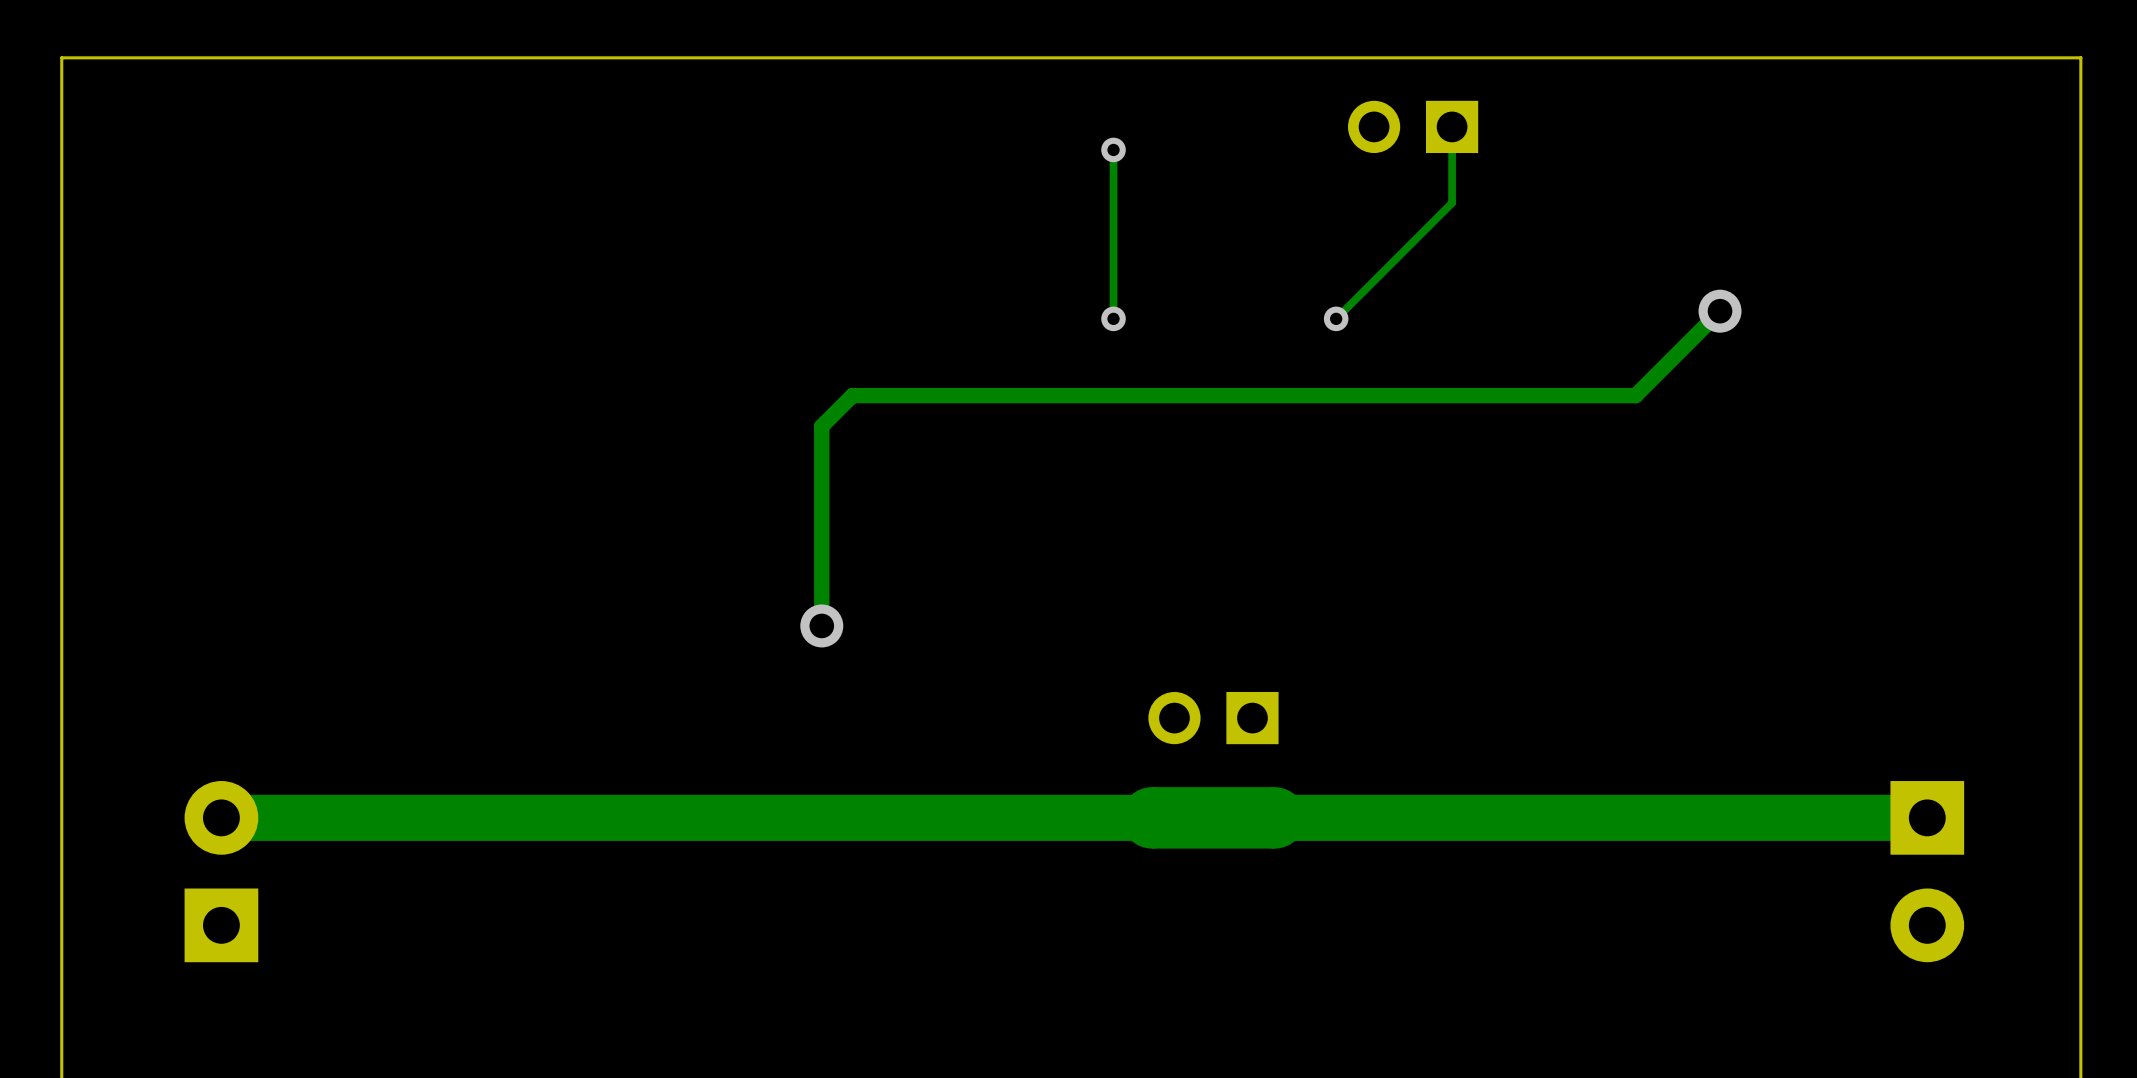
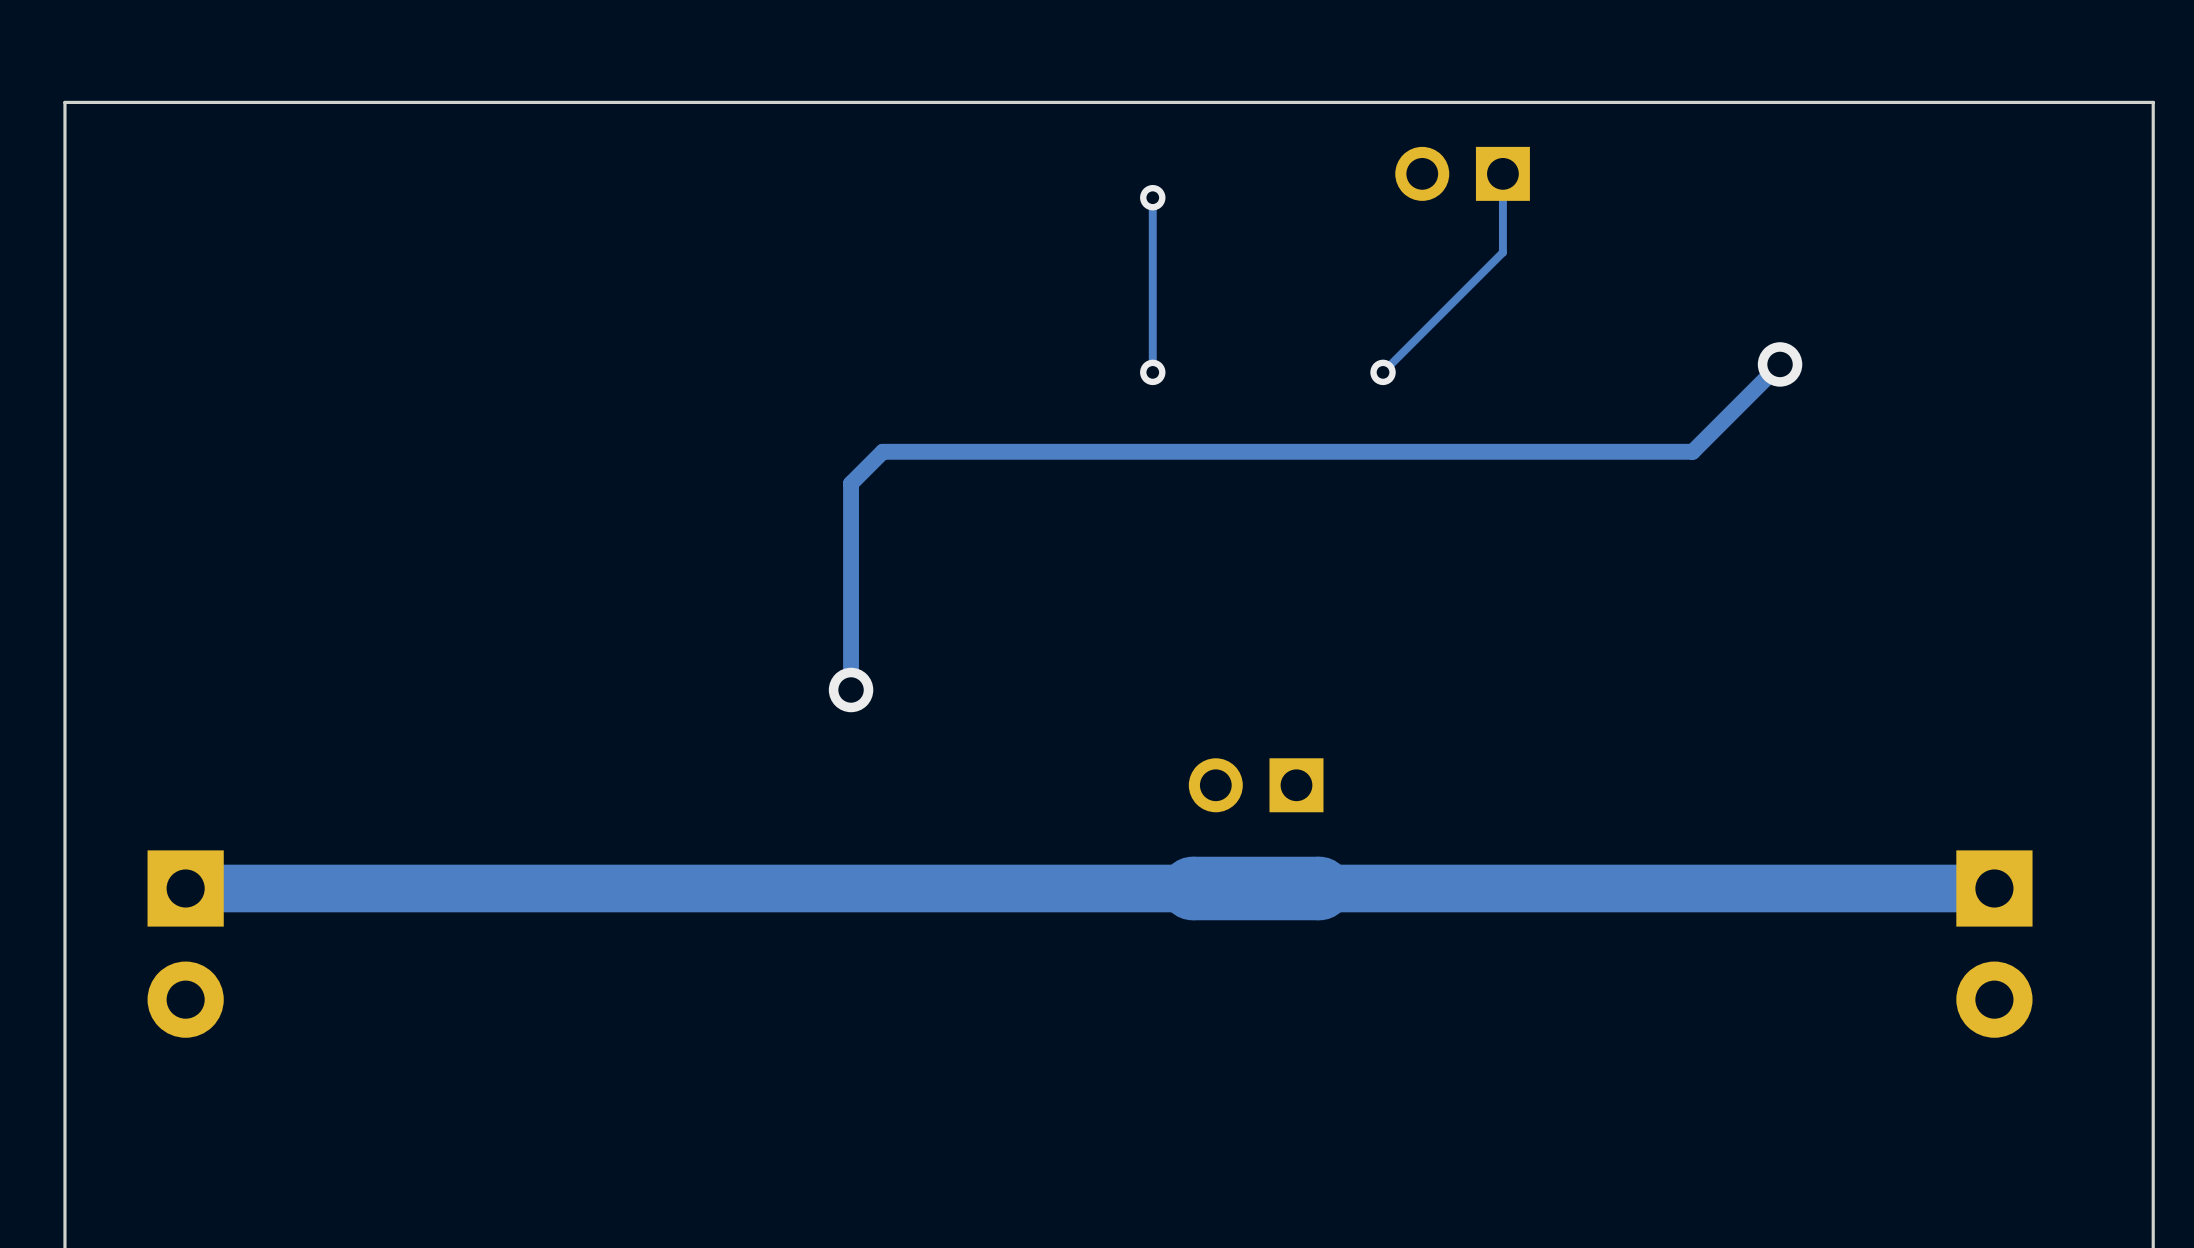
part rotation: 0° (221, 871) -> 180° (185, 944)

